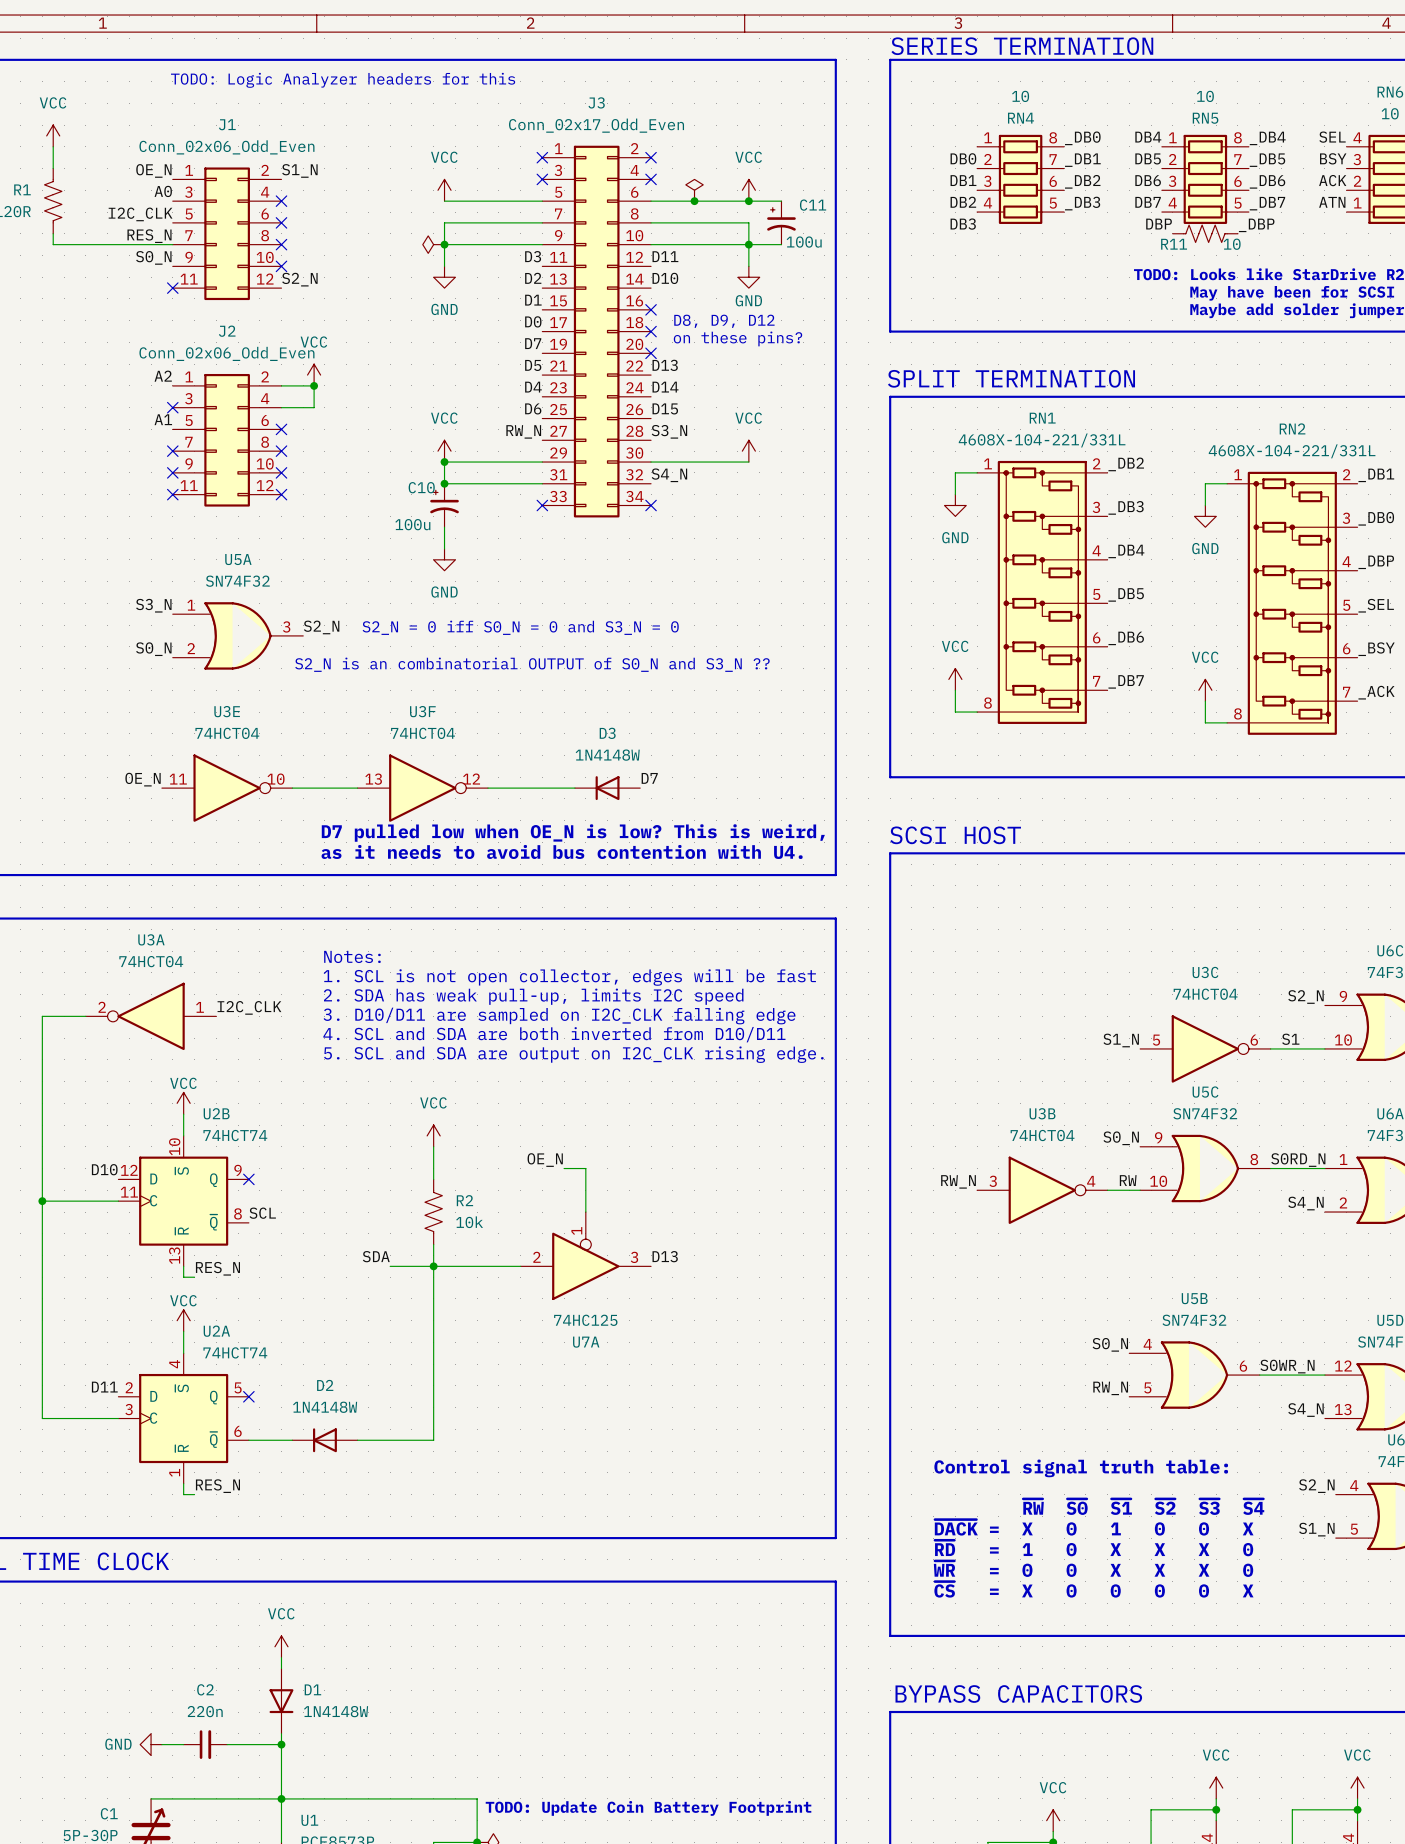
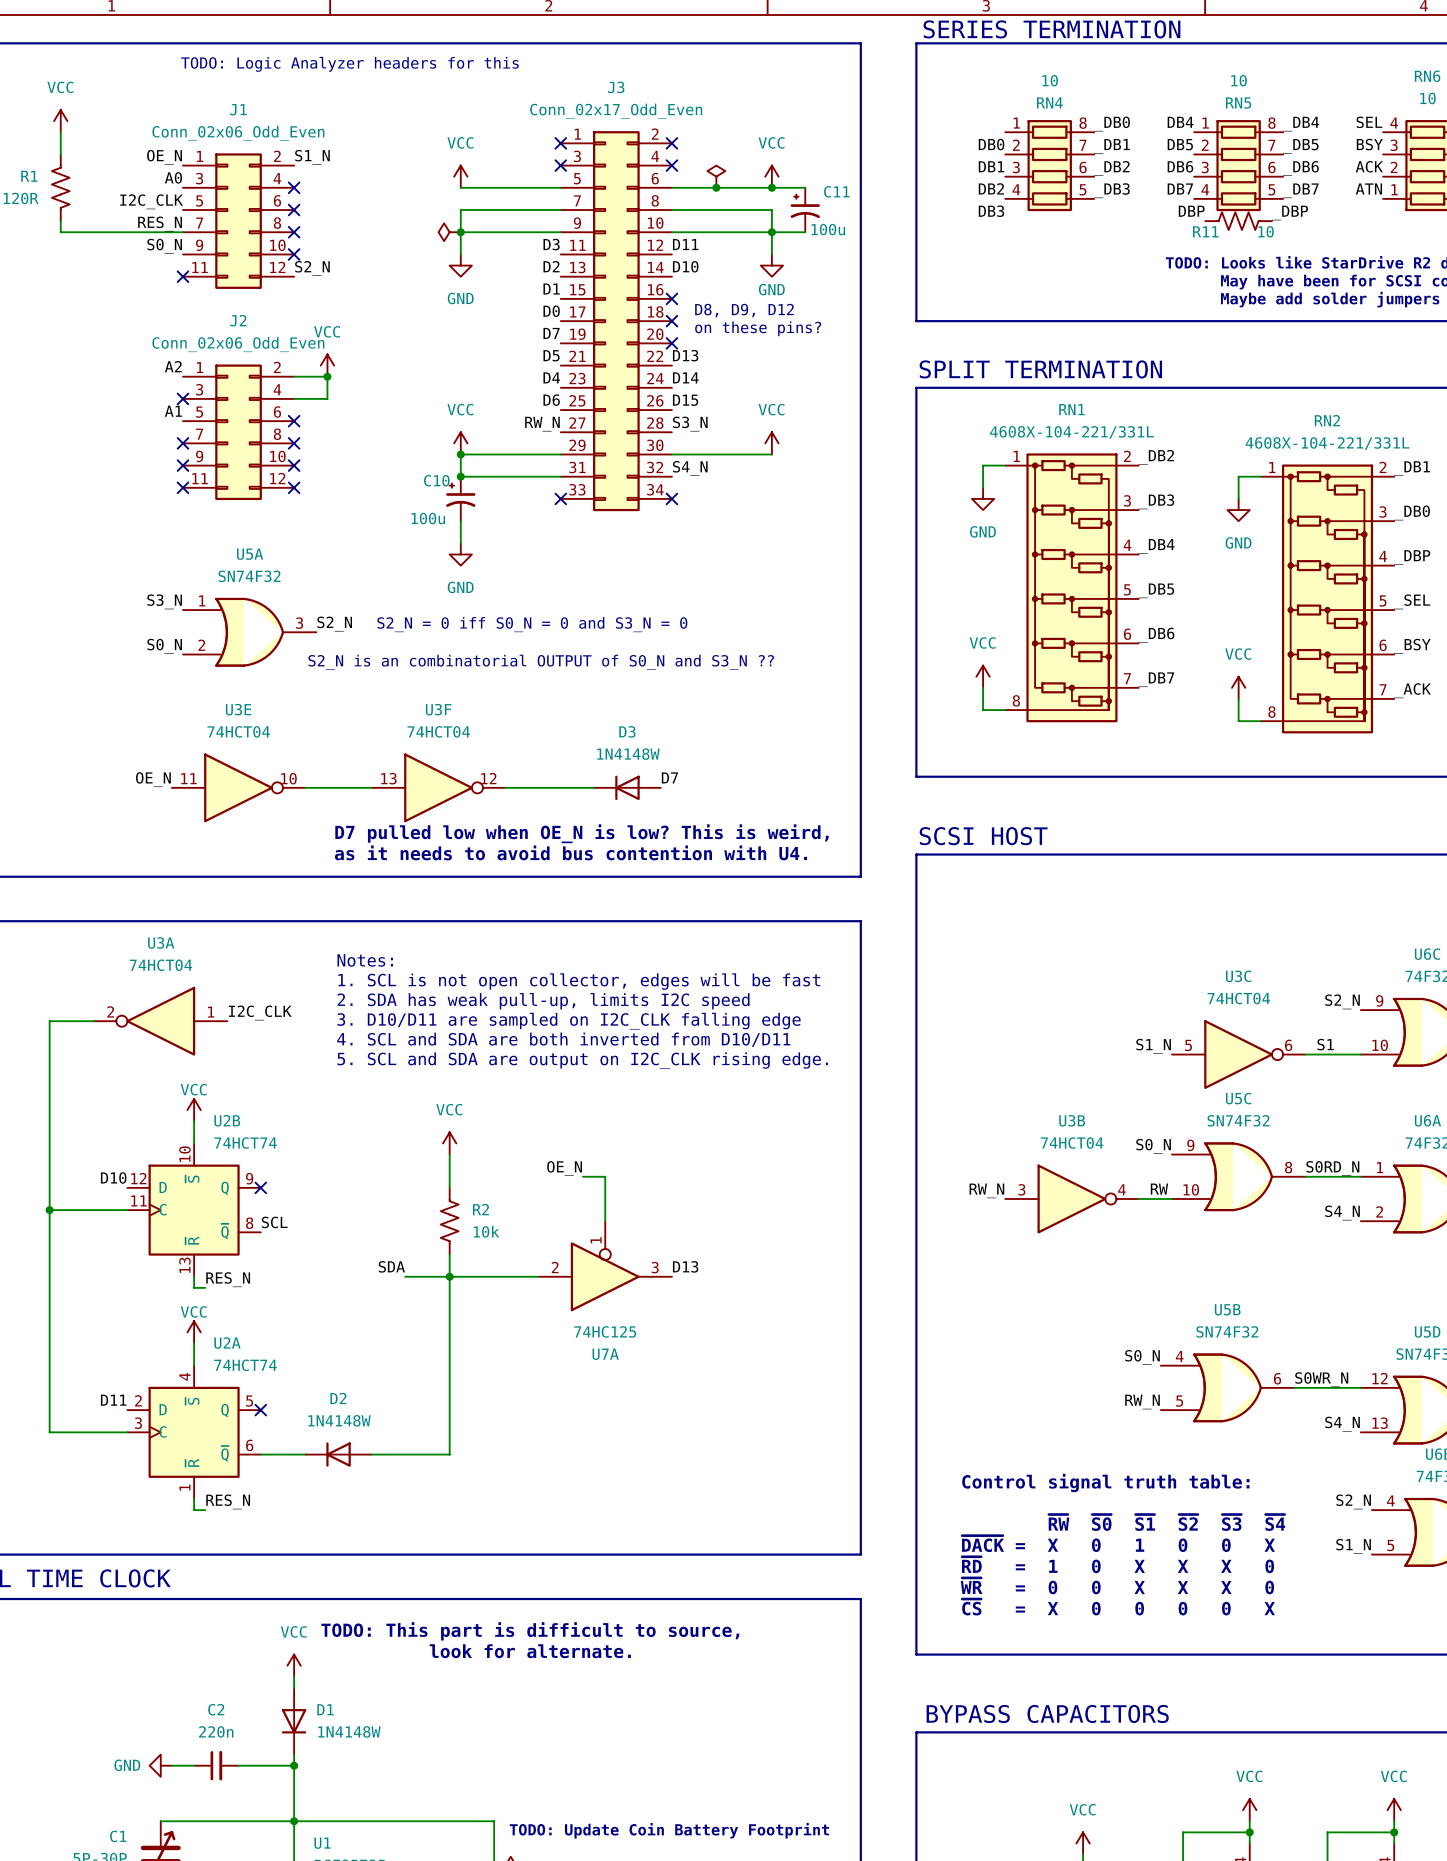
text: none -> TODO: This part is difficult to source, (530, 1631)
text: none -> look for alternate. (530, 1651)

